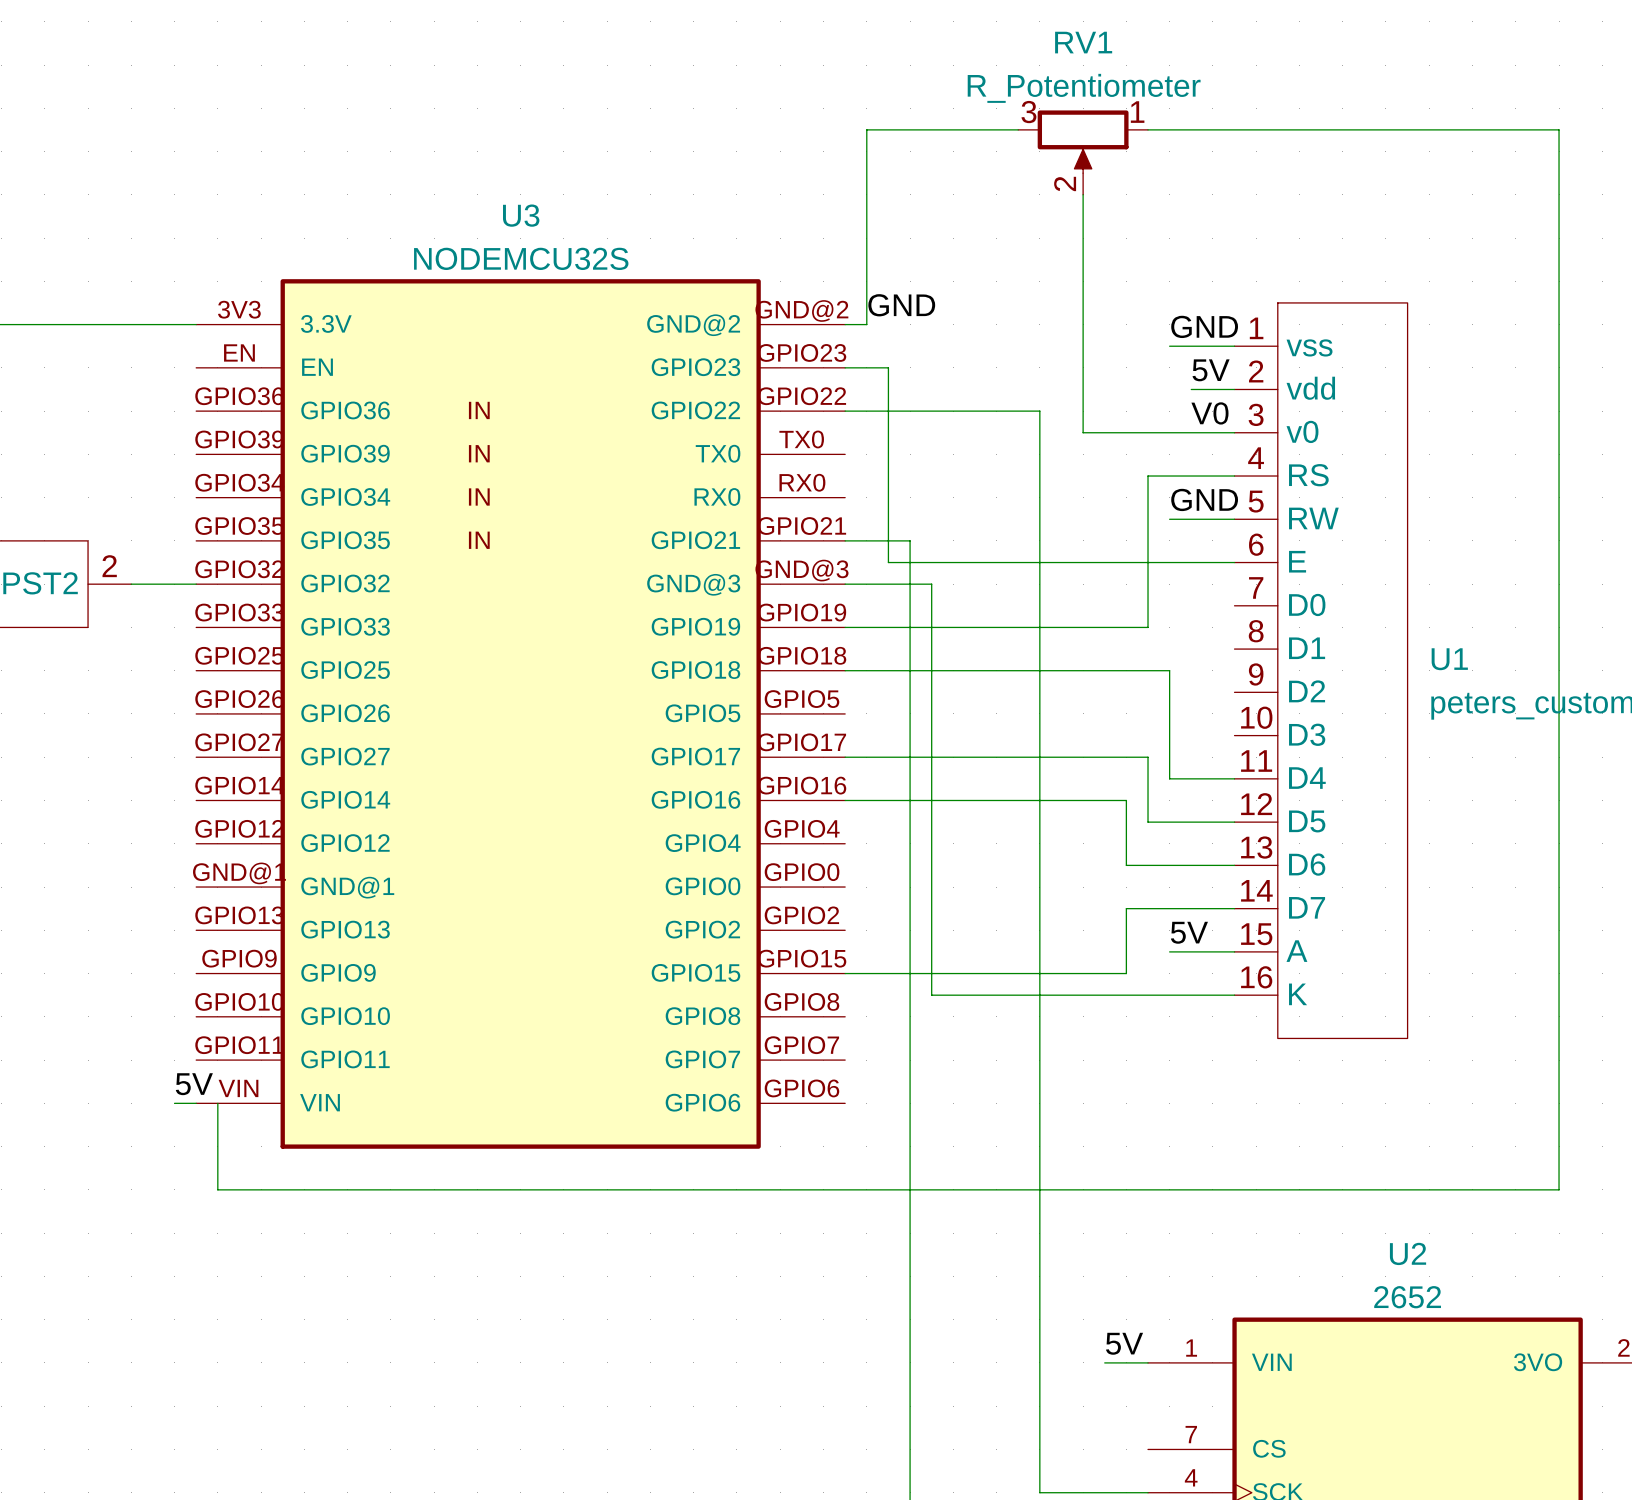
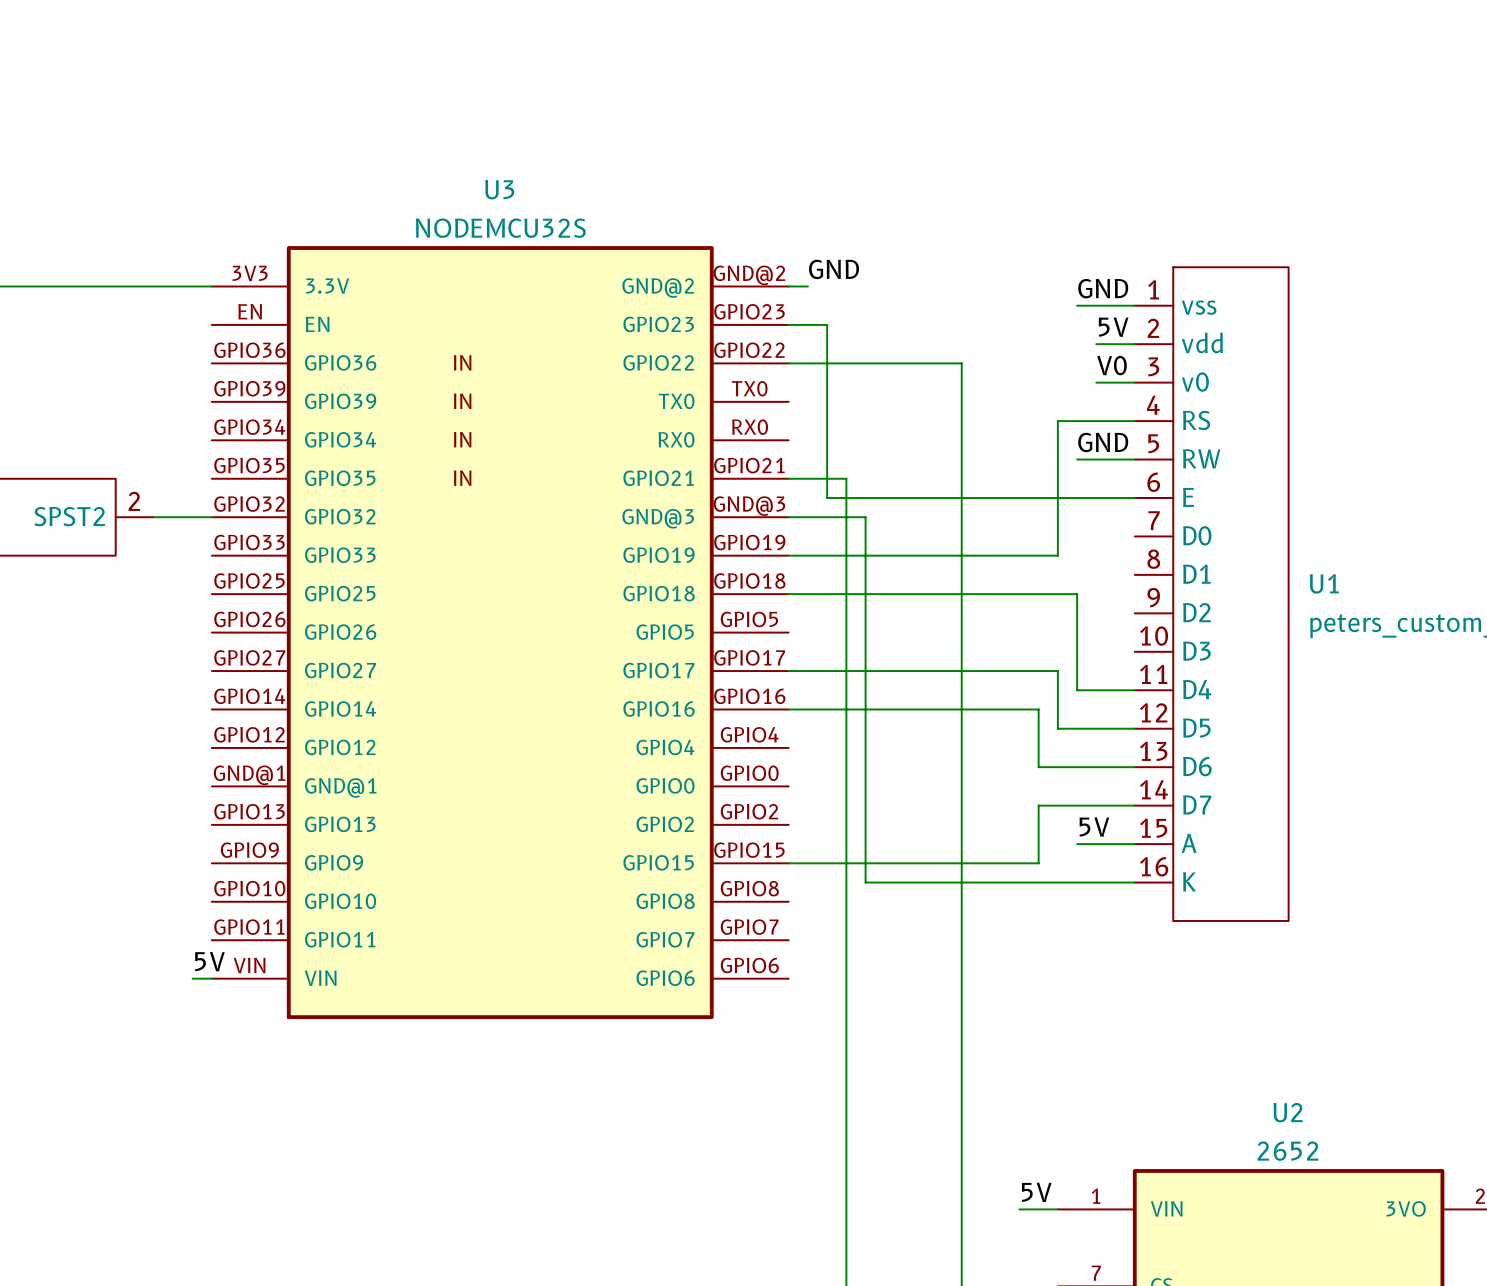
wire: (1018, 129) (866, 129) (866, 324) -> none
wire: (1148, 129) (1559, 129) (1559, 1189) (217, 1189) (217, 1103) -> none
RV1: R_Potentiometer (1083, 152) -> none
wire: (1083, 194) (1083, 432) (1191, 432) -> none

